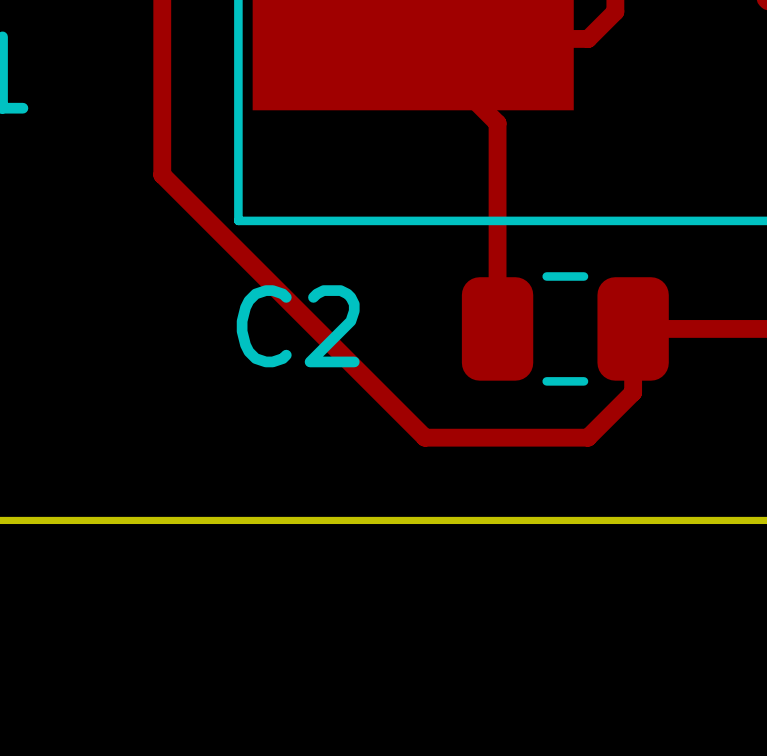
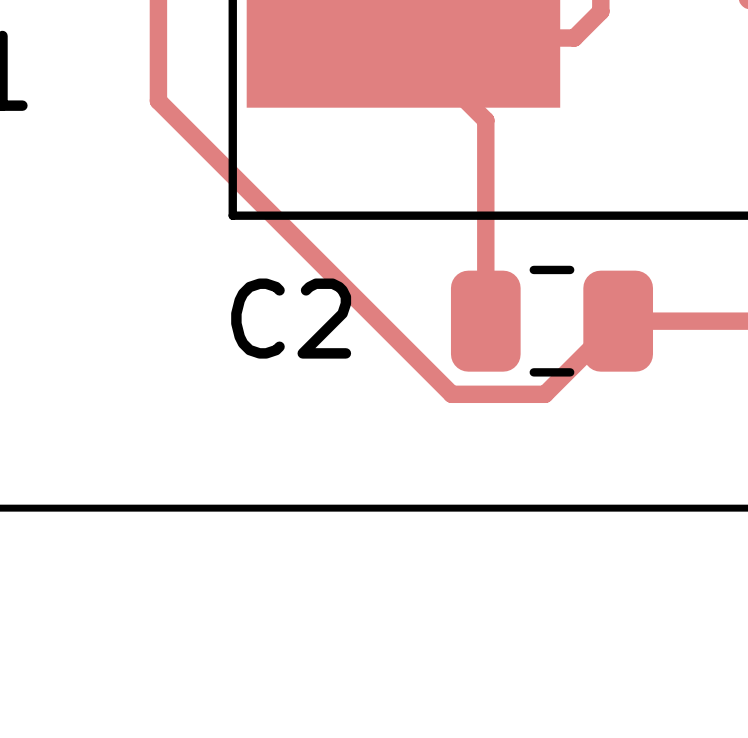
top track: (162, 103) (162, 174) (425, 437) (588, 437) (633, 392) (633, 328) -> (158, 100) (451, 394) (545, 394) (618, 321)

